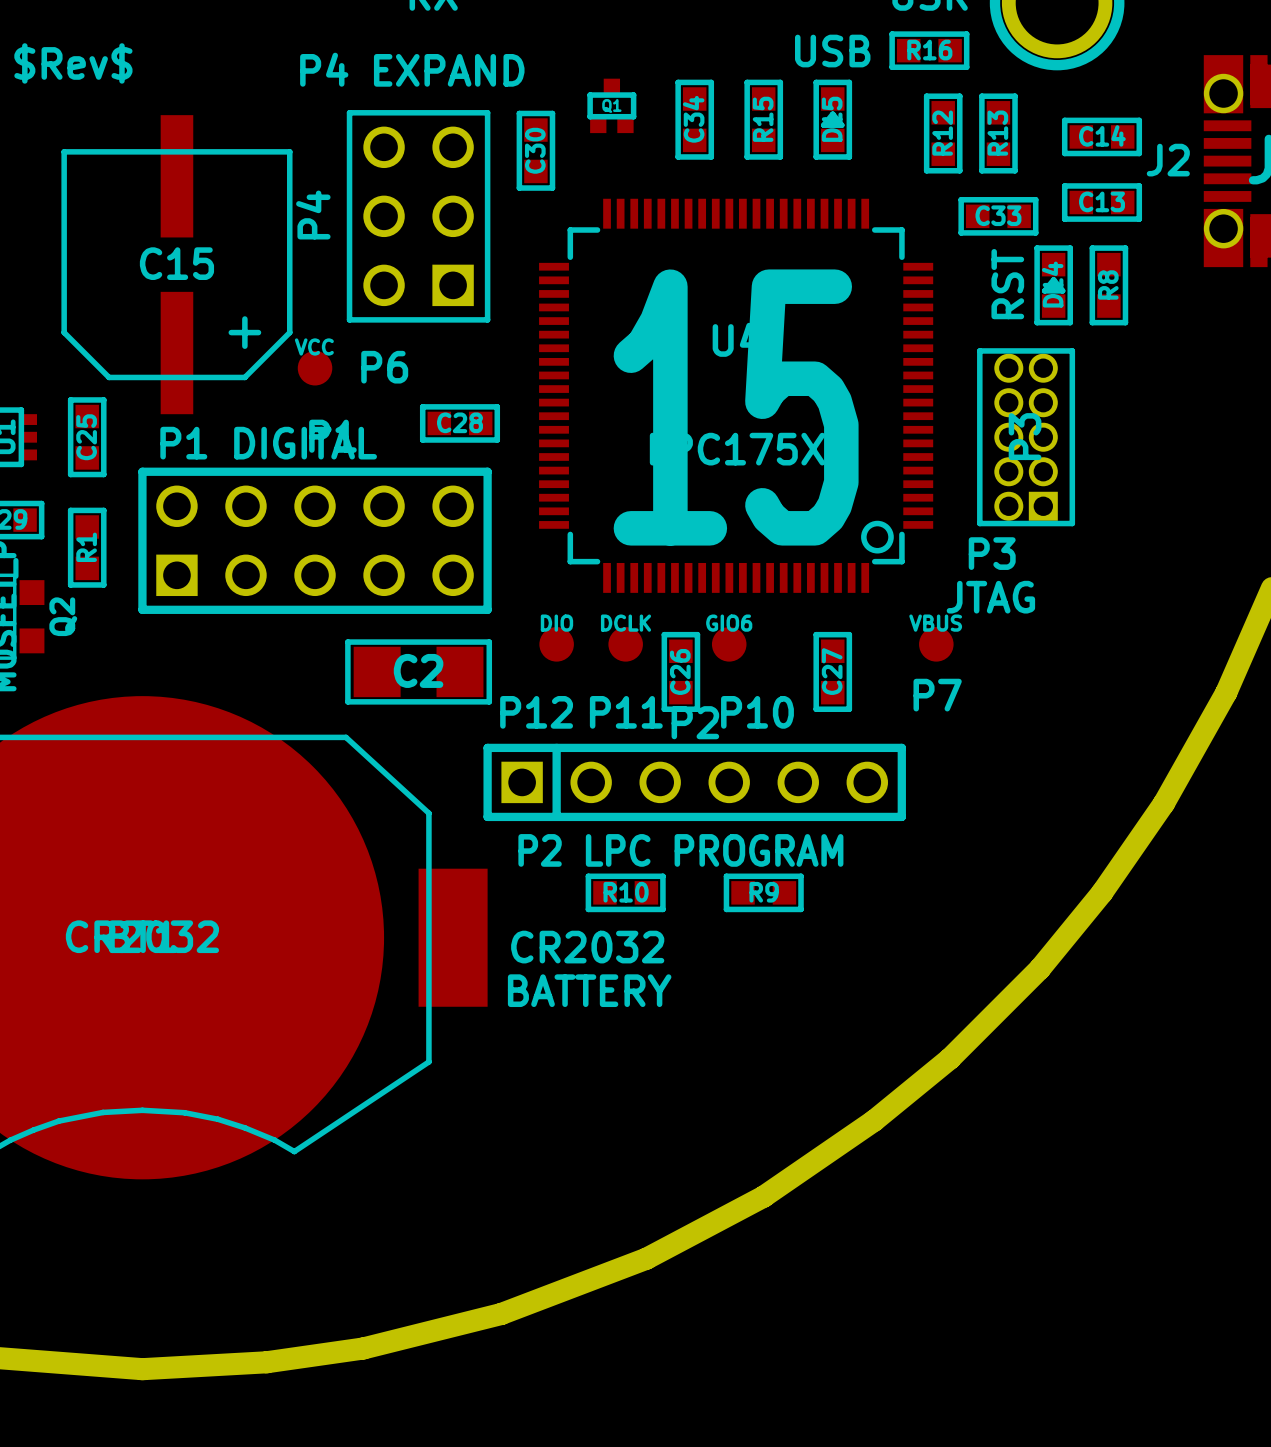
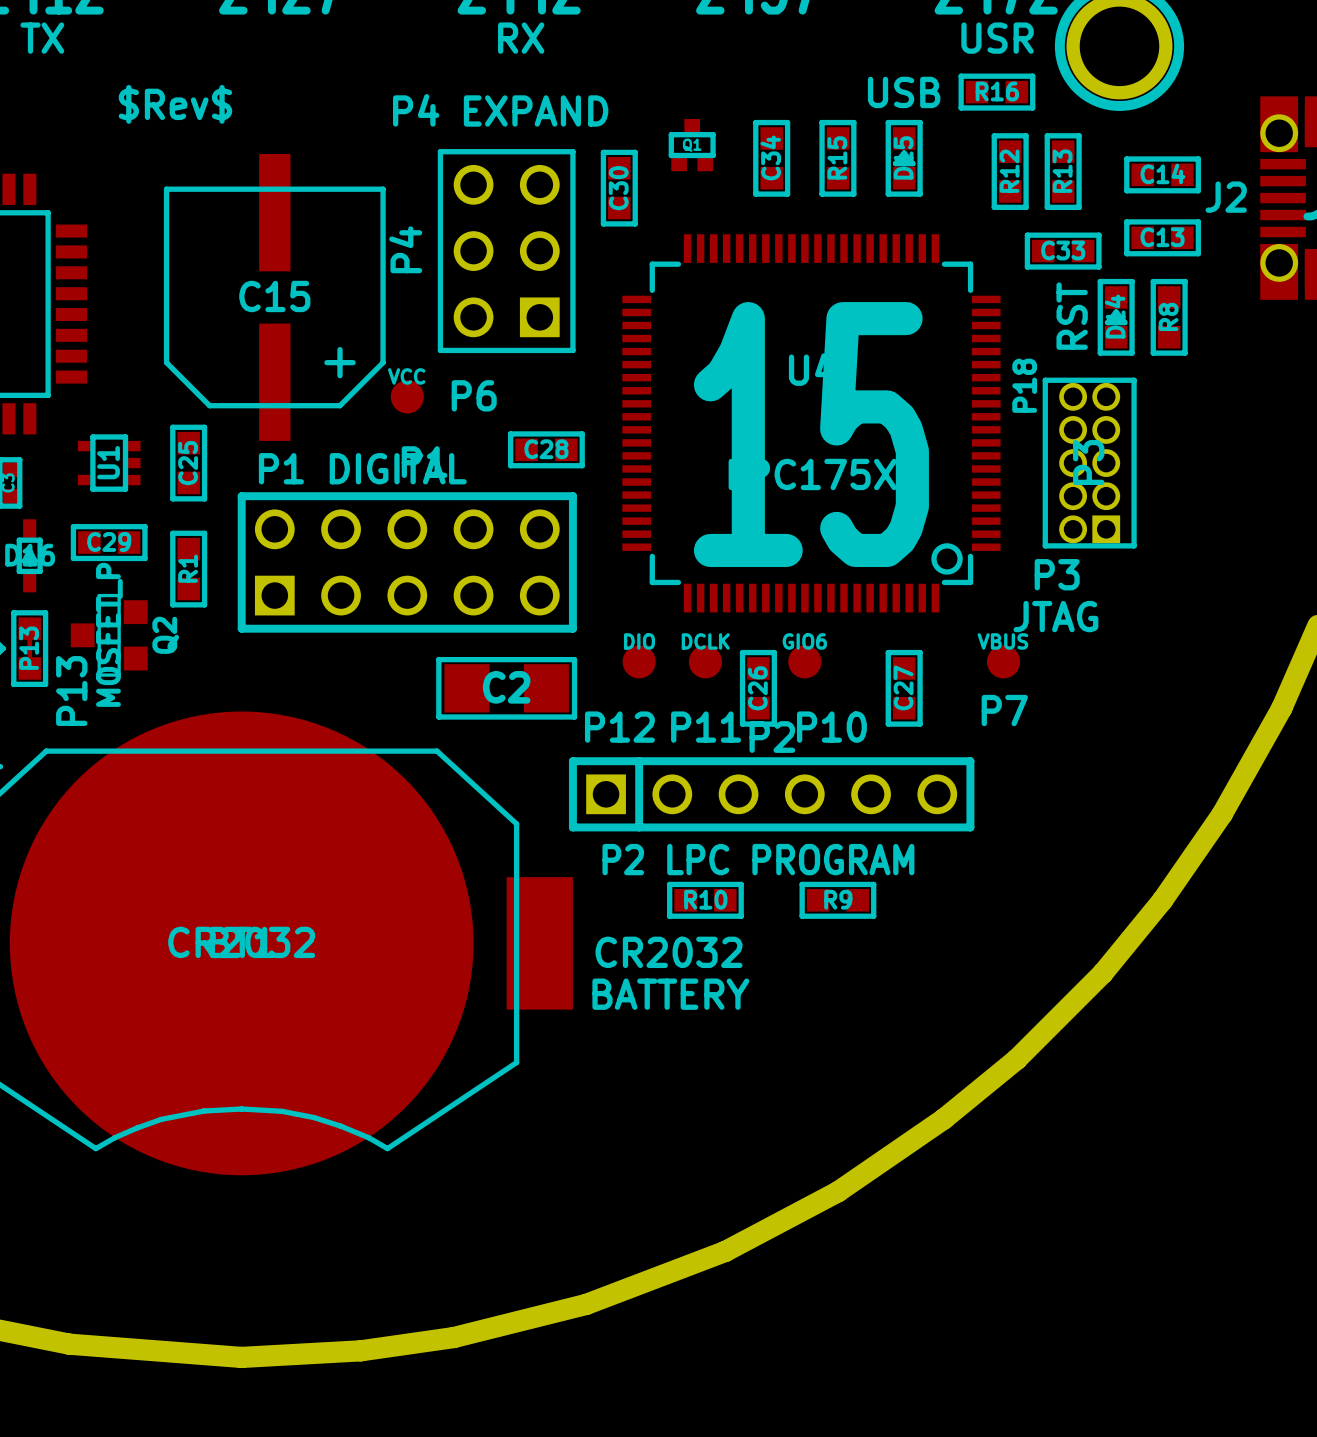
text: none -> P18 (1024, 385)

